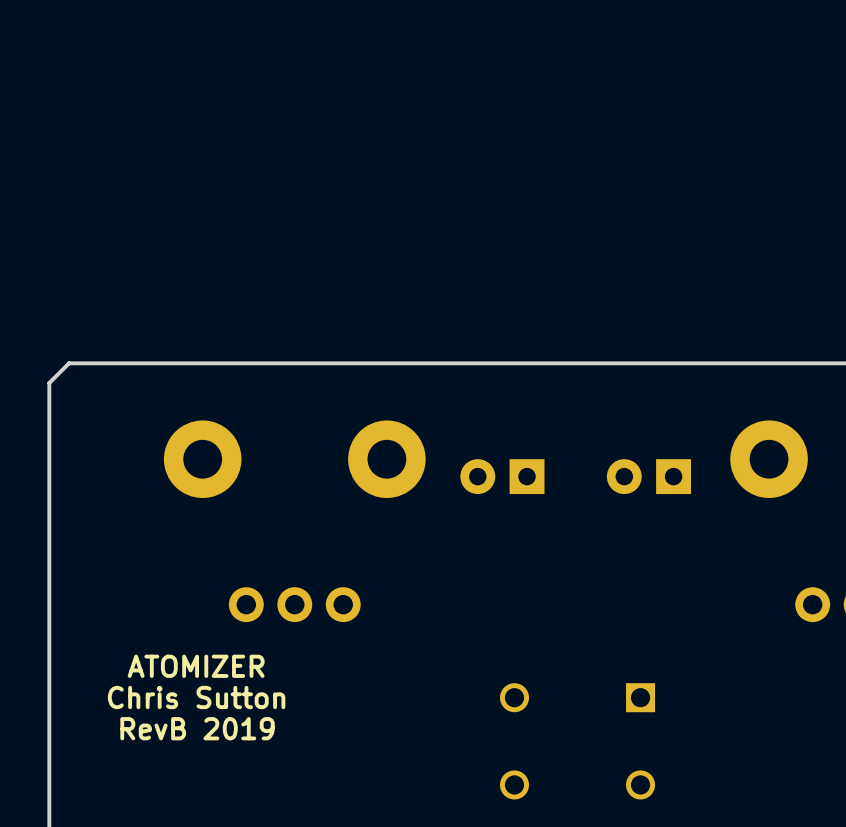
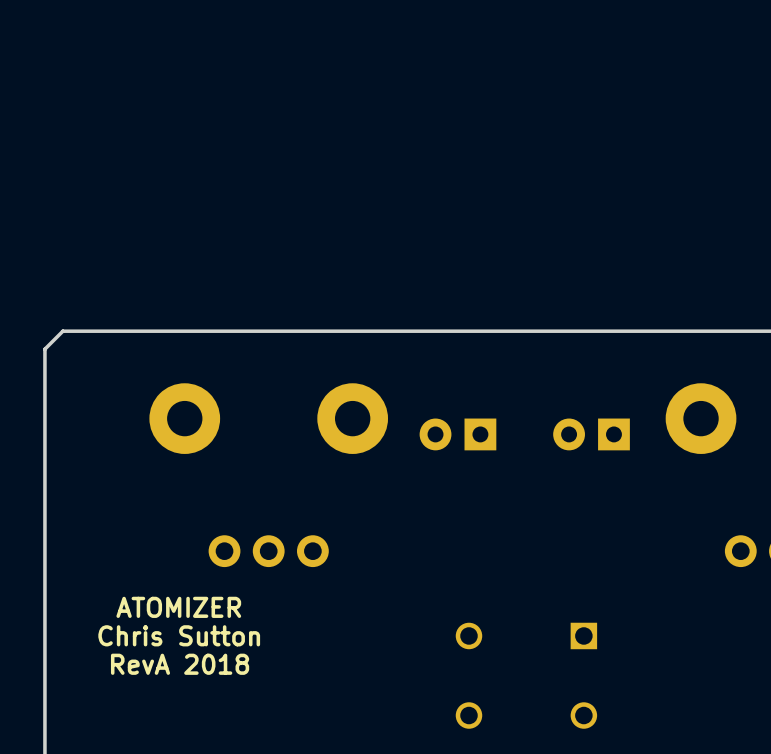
text: RevB 2019 (197, 728) -> RevA 2018 (180, 664)

